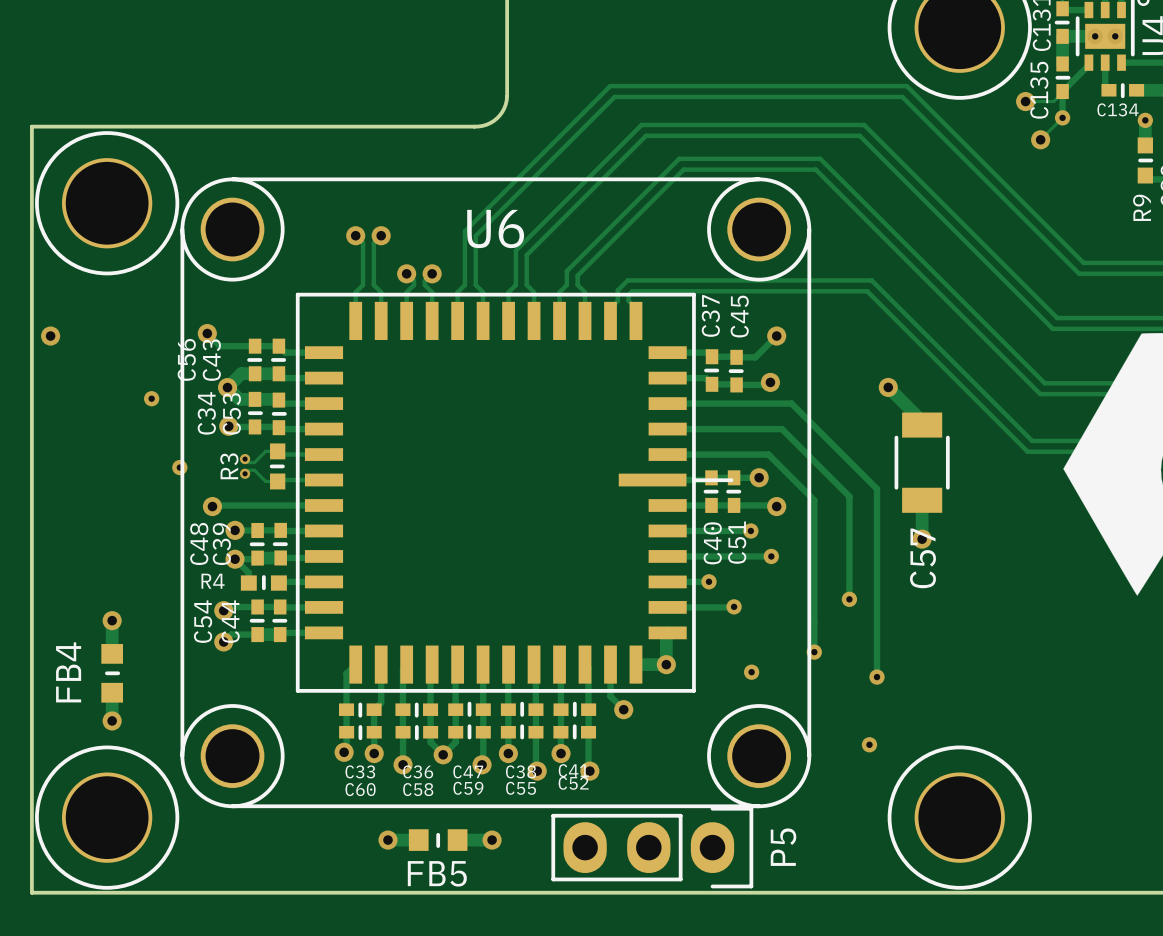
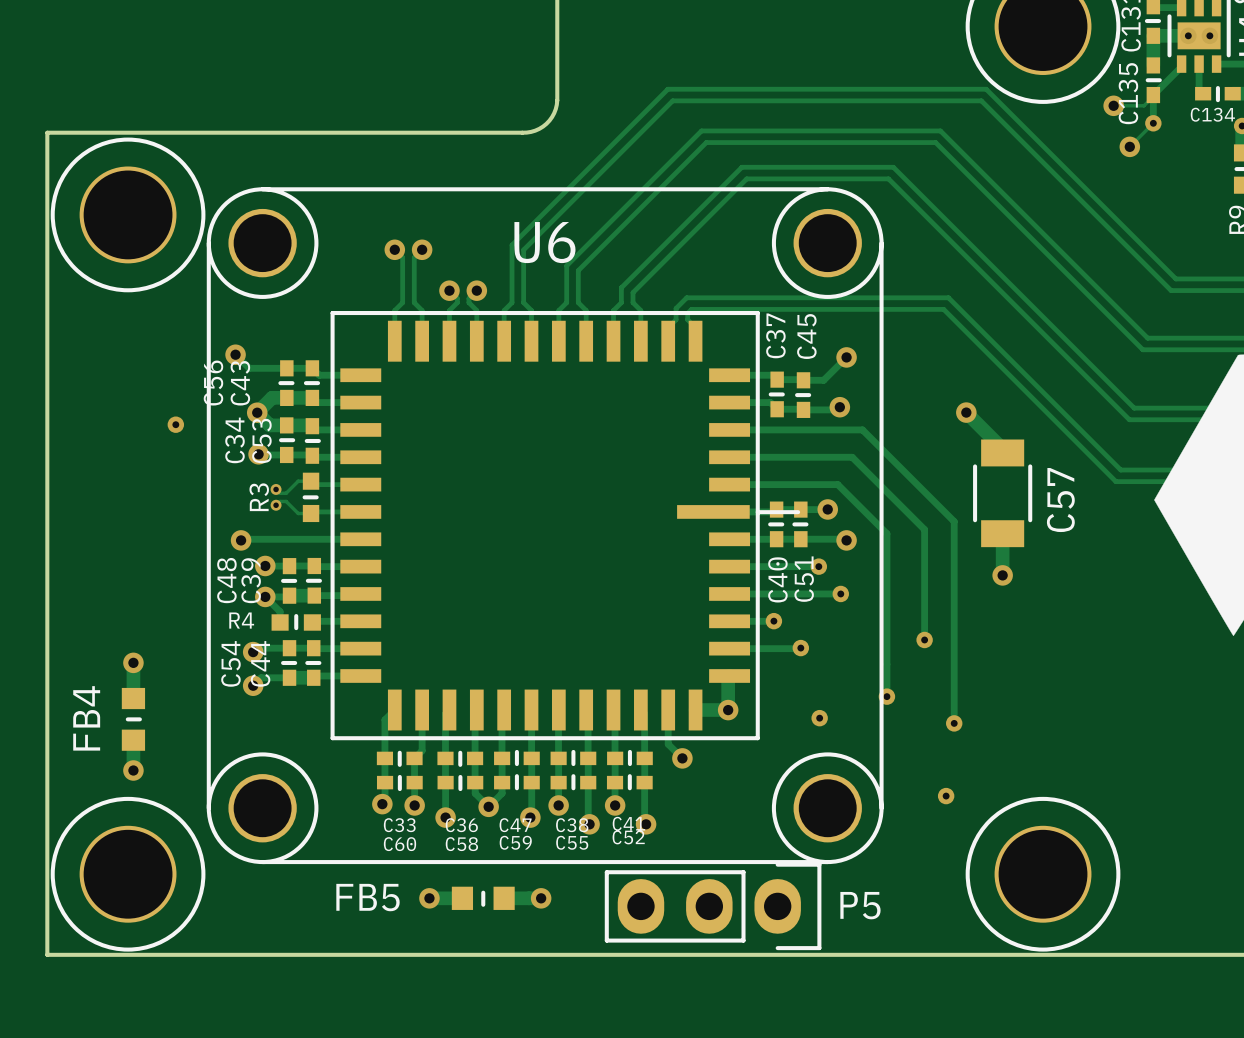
via: (50, 336) -> none
via: (179, 467) -> none
C57 name position: C57 (922, 558) -> C57 (1060, 500)
P5 name rotation: 0° (783, 847) -> 90° clockwise (860, 905)
FB5 name position: FB5 (437, 873) -> FB5 (368, 897)

